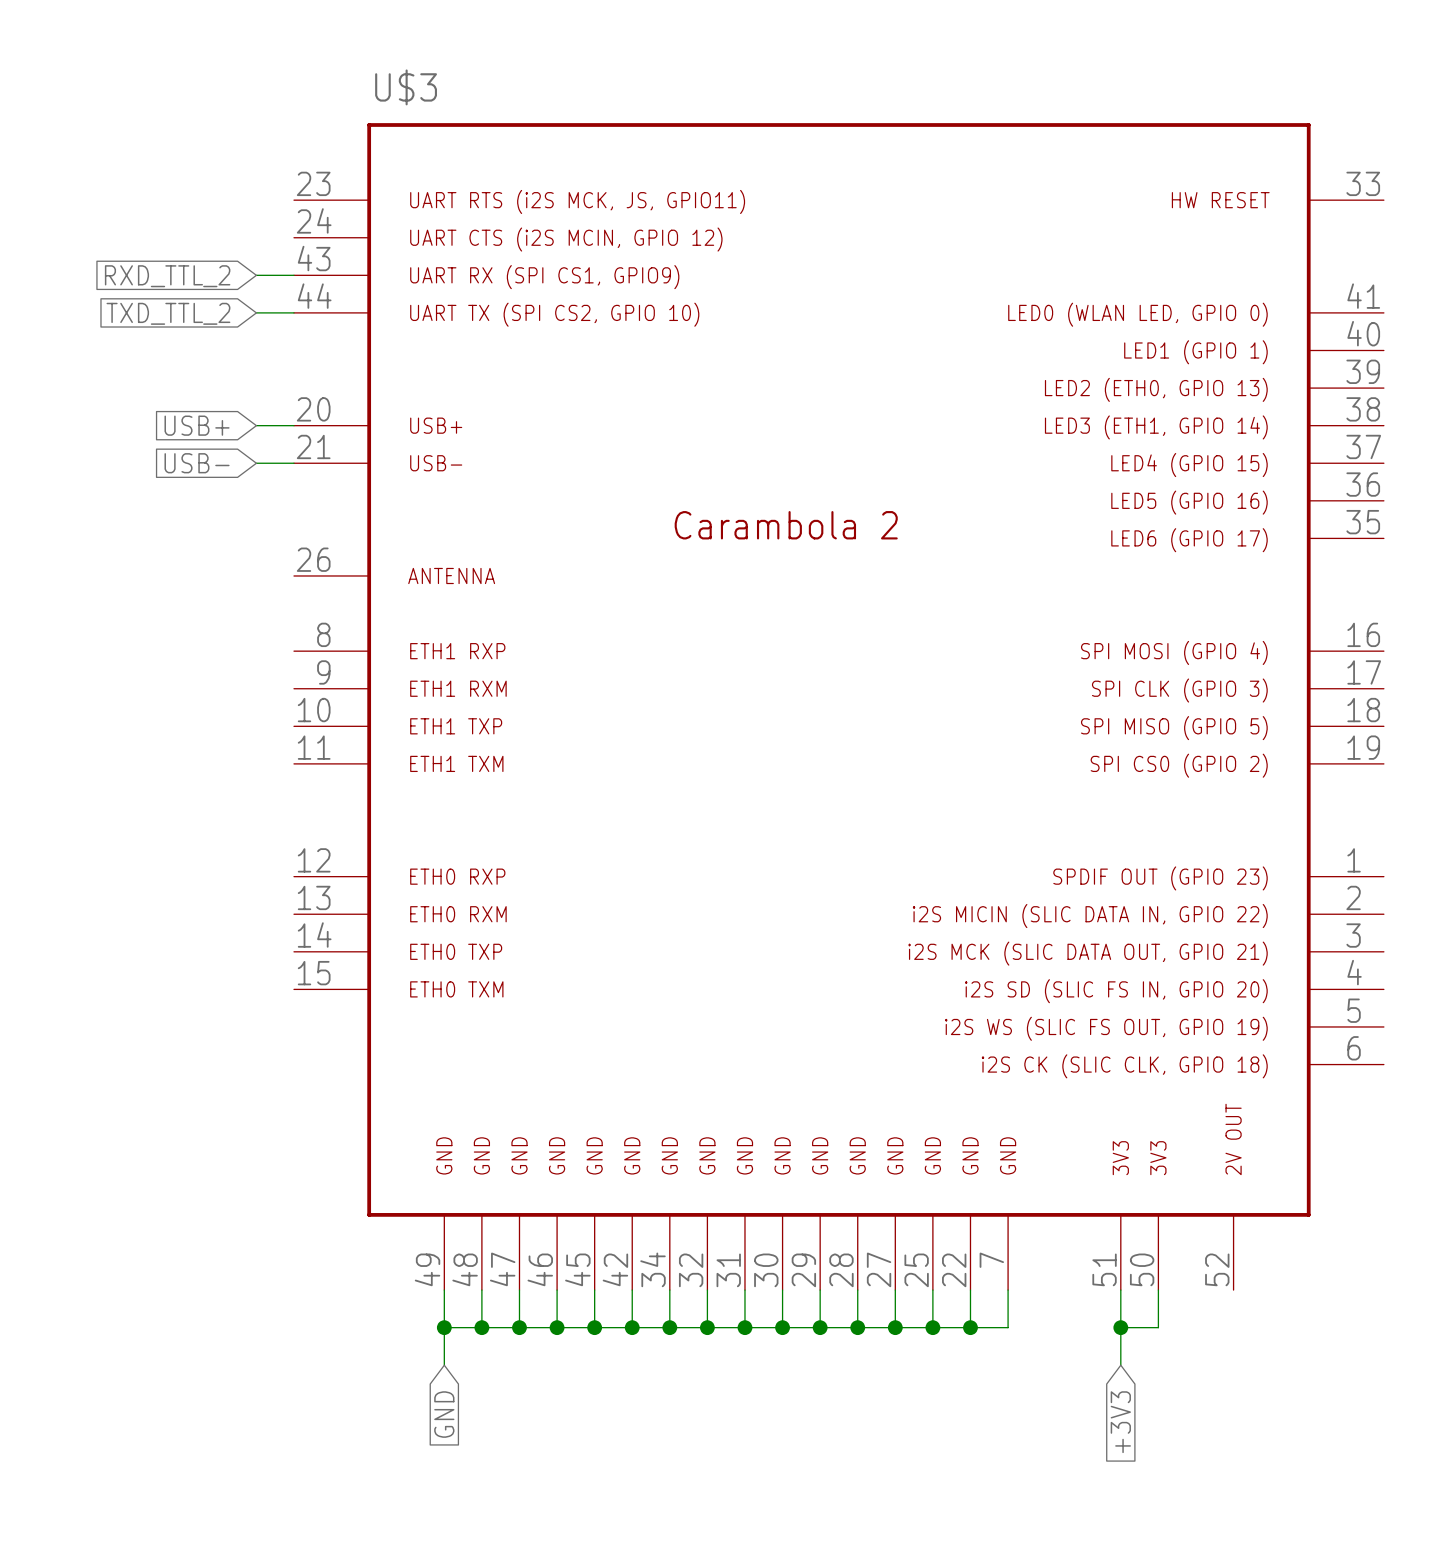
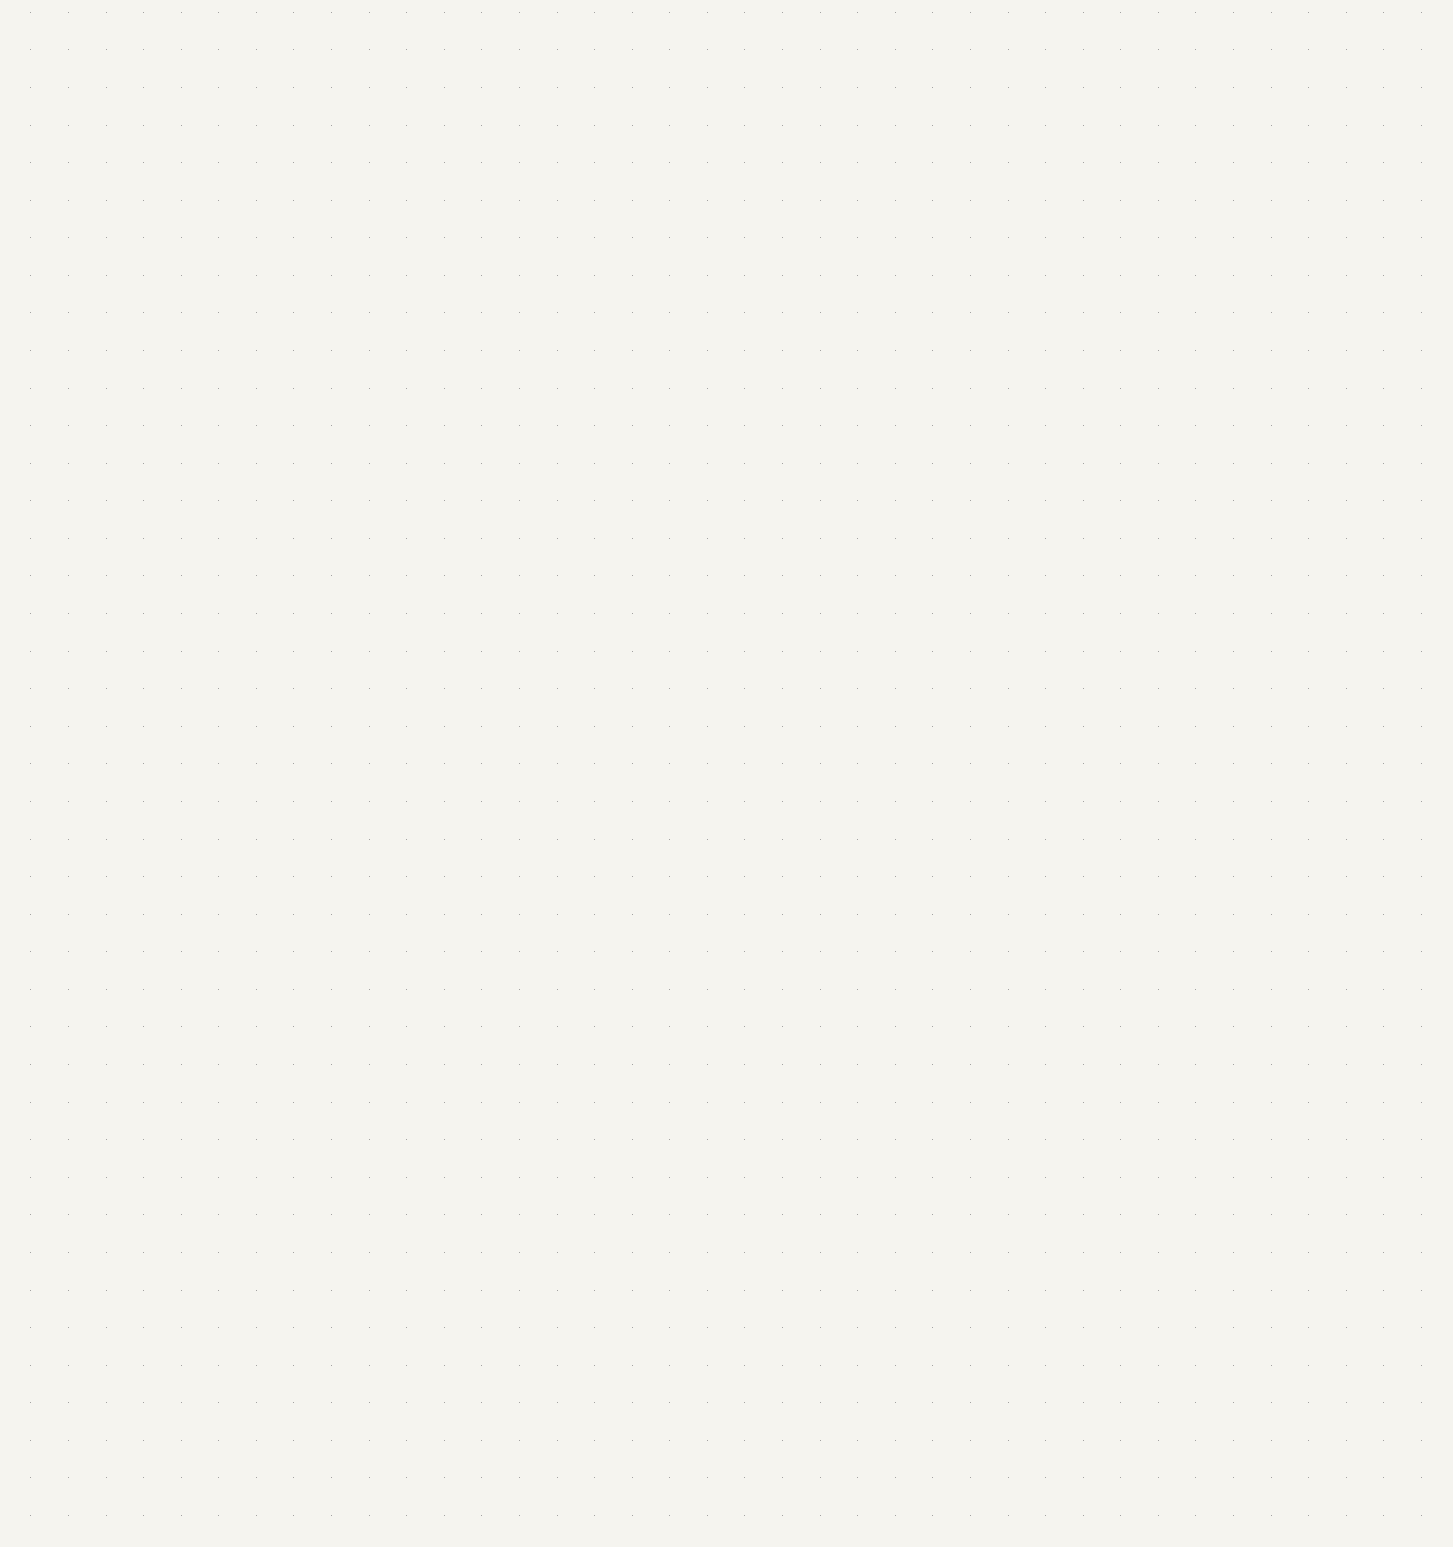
wire: (256, 275) (293, 275) -> none
global label: RXD_TTL_2 (167, 276) -> none
wire: (256, 312) (293, 312) -> none
global label: TXD_TTL_2 (168, 313) -> none
global label: USB+ (197, 425) -> none
wire: (256, 425) (293, 425) -> none
global label: USB- (197, 463) -> none
wire: (256, 463) (293, 463) -> none
U$3: (838, 706) -> none
wire: (444, 1290) (444, 1365) -> none
wire: (481, 1290) (481, 1327) -> none
wire: (519, 1290) (519, 1327) -> none
wire: (557, 1290) (557, 1327) -> none
wire: (594, 1290) (594, 1327) -> none
wire: (632, 1290) (632, 1327) -> none
wire: (669, 1290) (669, 1327) -> none
wire: (707, 1290) (707, 1327) -> none
wire: (744, 1290) (744, 1327) -> none
wire: (782, 1290) (782, 1327) -> none
wire: (820, 1290) (820, 1327) -> none
wire: (857, 1290) (857, 1327) -> none
wire: (895, 1290) (895, 1327) -> none
wire: (932, 1290) (932, 1327) -> none
wire: (970, 1290) (970, 1327) -> none
wire: (1008, 1290) (1008, 1327) (444, 1327) -> none
wire: (1120, 1290) (1120, 1365) -> none
wire: (1158, 1290) (1158, 1327) (1120, 1327) -> none
junction: (444, 1327) -> none
junction: (481, 1327) -> none
junction: (519, 1327) -> none
junction: (557, 1327) -> none
junction: (594, 1327) -> none
junction: (632, 1327) -> none
junction: (669, 1327) -> none
junction: (707, 1327) -> none
junction: (744, 1327) -> none
junction: (782, 1327) -> none
junction: (820, 1327) -> none
junction: (857, 1327) -> none
junction: (895, 1327) -> none
junction: (932, 1327) -> none
junction: (970, 1327) -> none
junction: (1120, 1327) -> none
global label: GND (444, 1414) -> none
global label: +3V3 (1120, 1422) -> none

